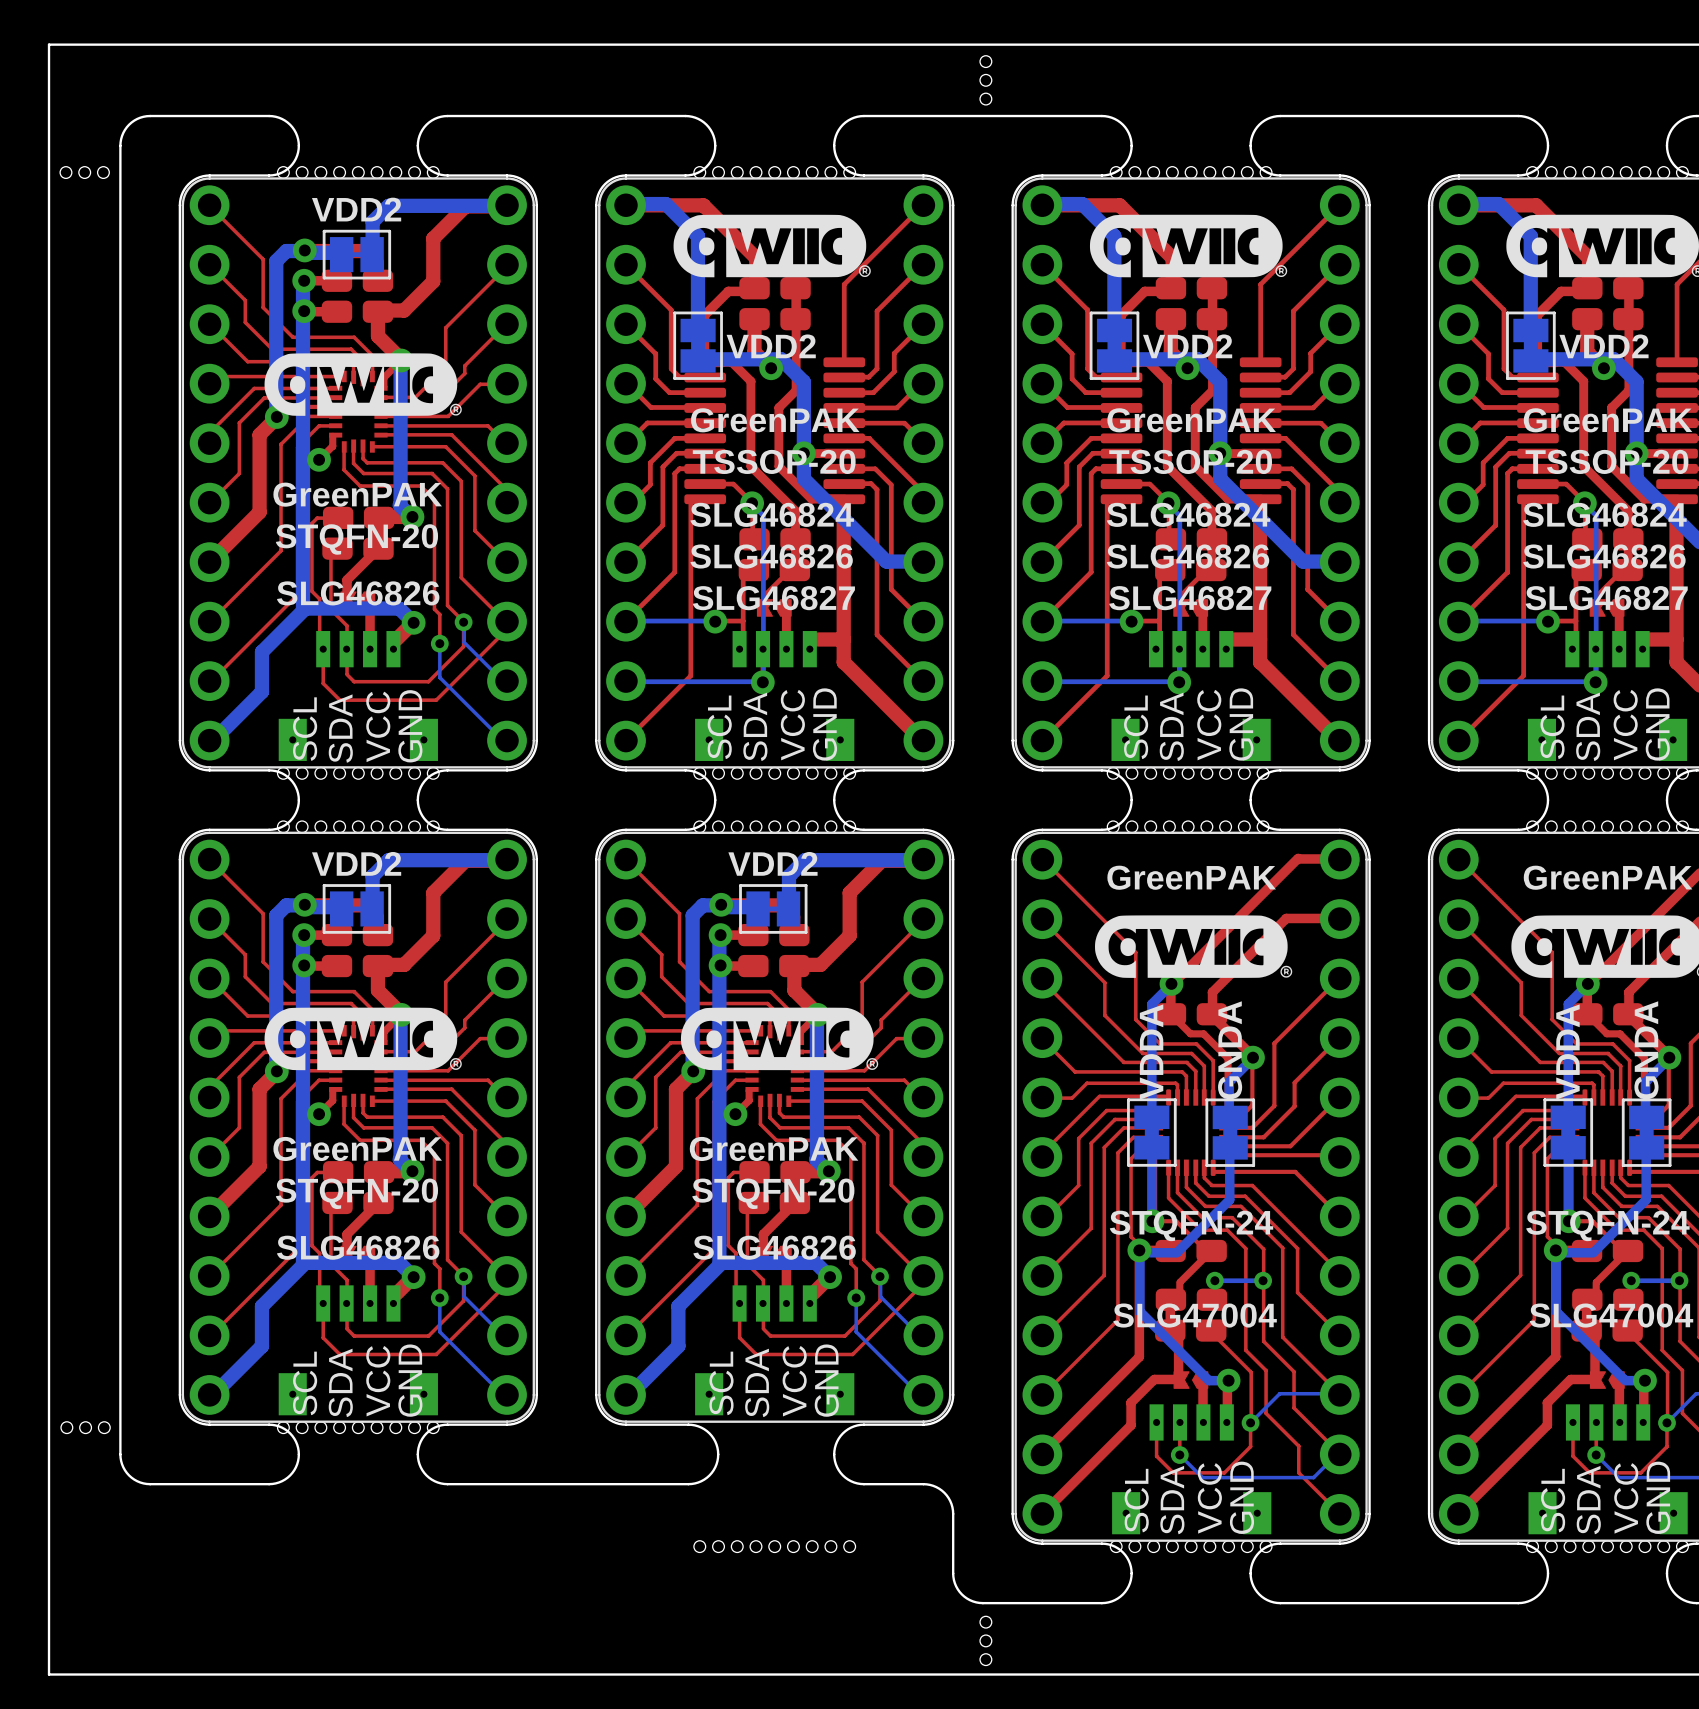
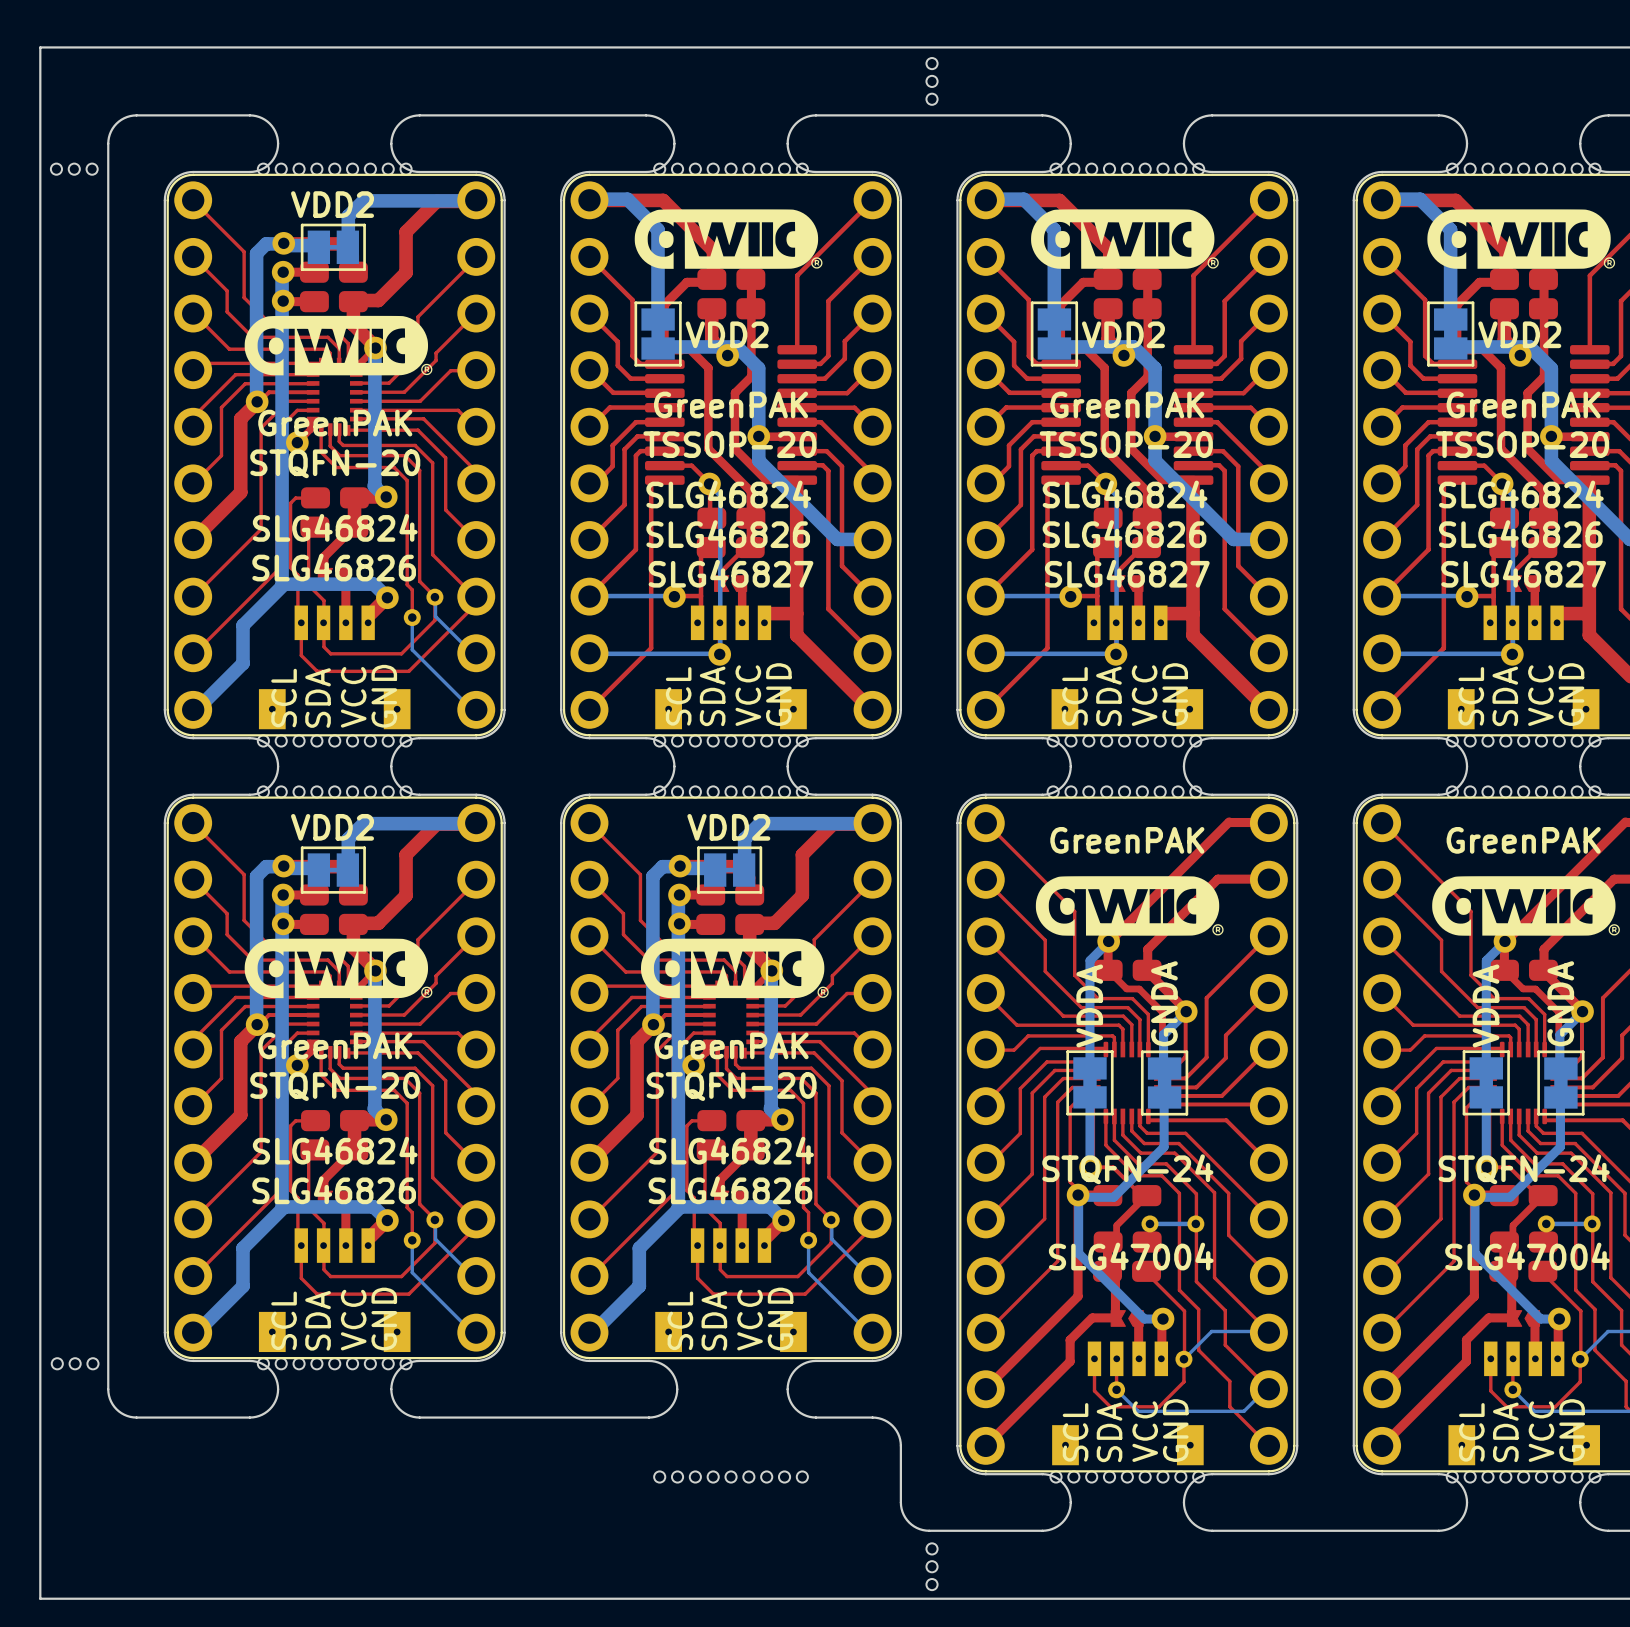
part footprint: [181, 177, 535, 769] -> [166, 173, 503, 737]
part footprint: [181, 831, 535, 1423] -> [166, 796, 503, 1360]
part footprint: [598, 831, 952, 1423] -> [562, 796, 900, 1360]

